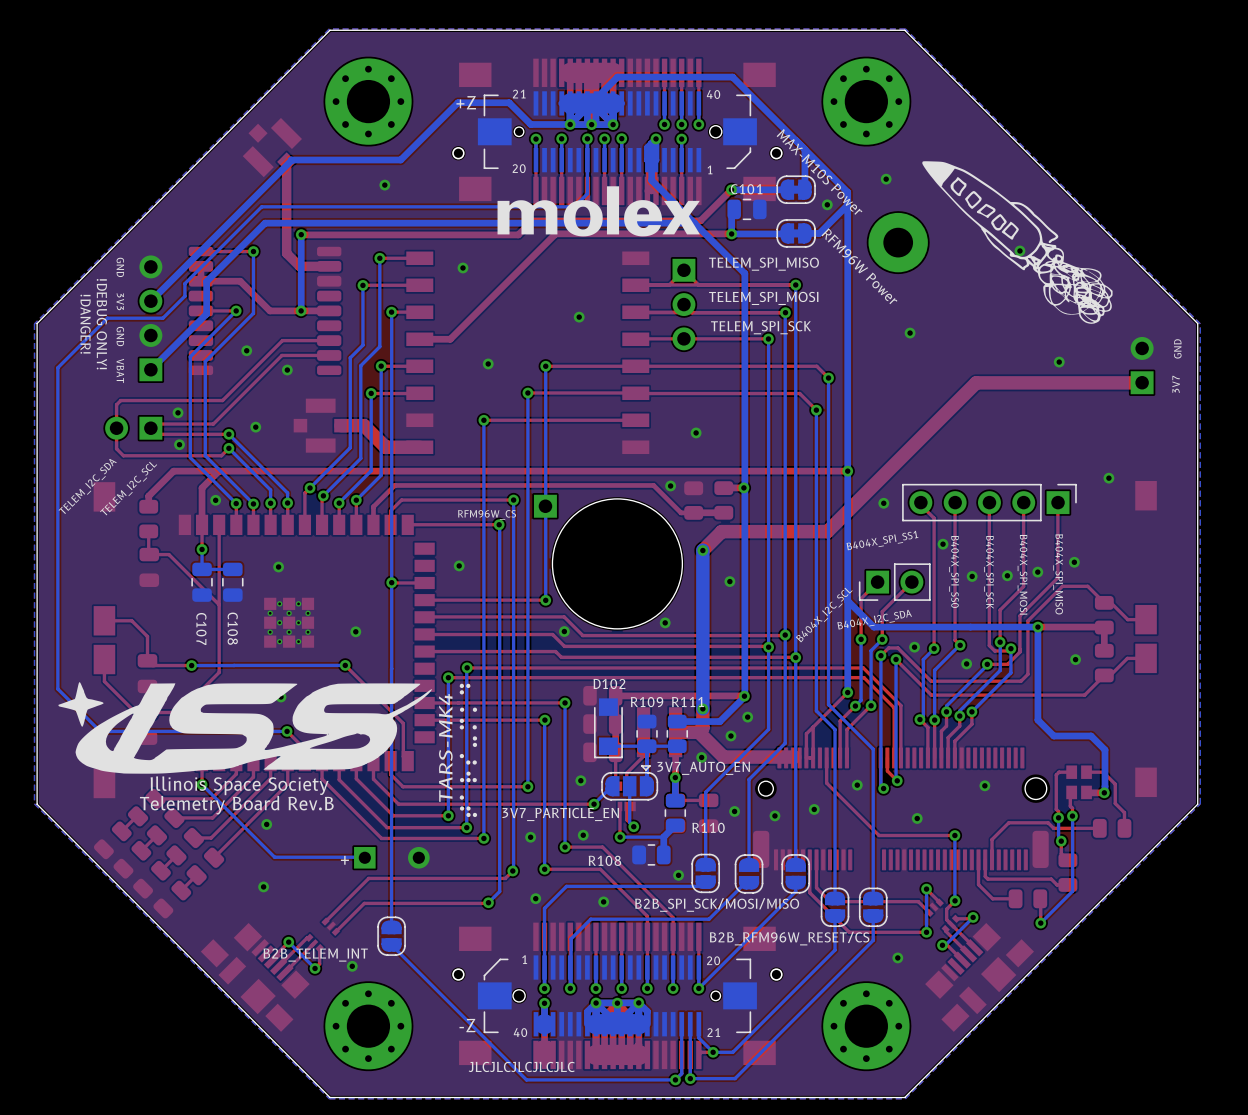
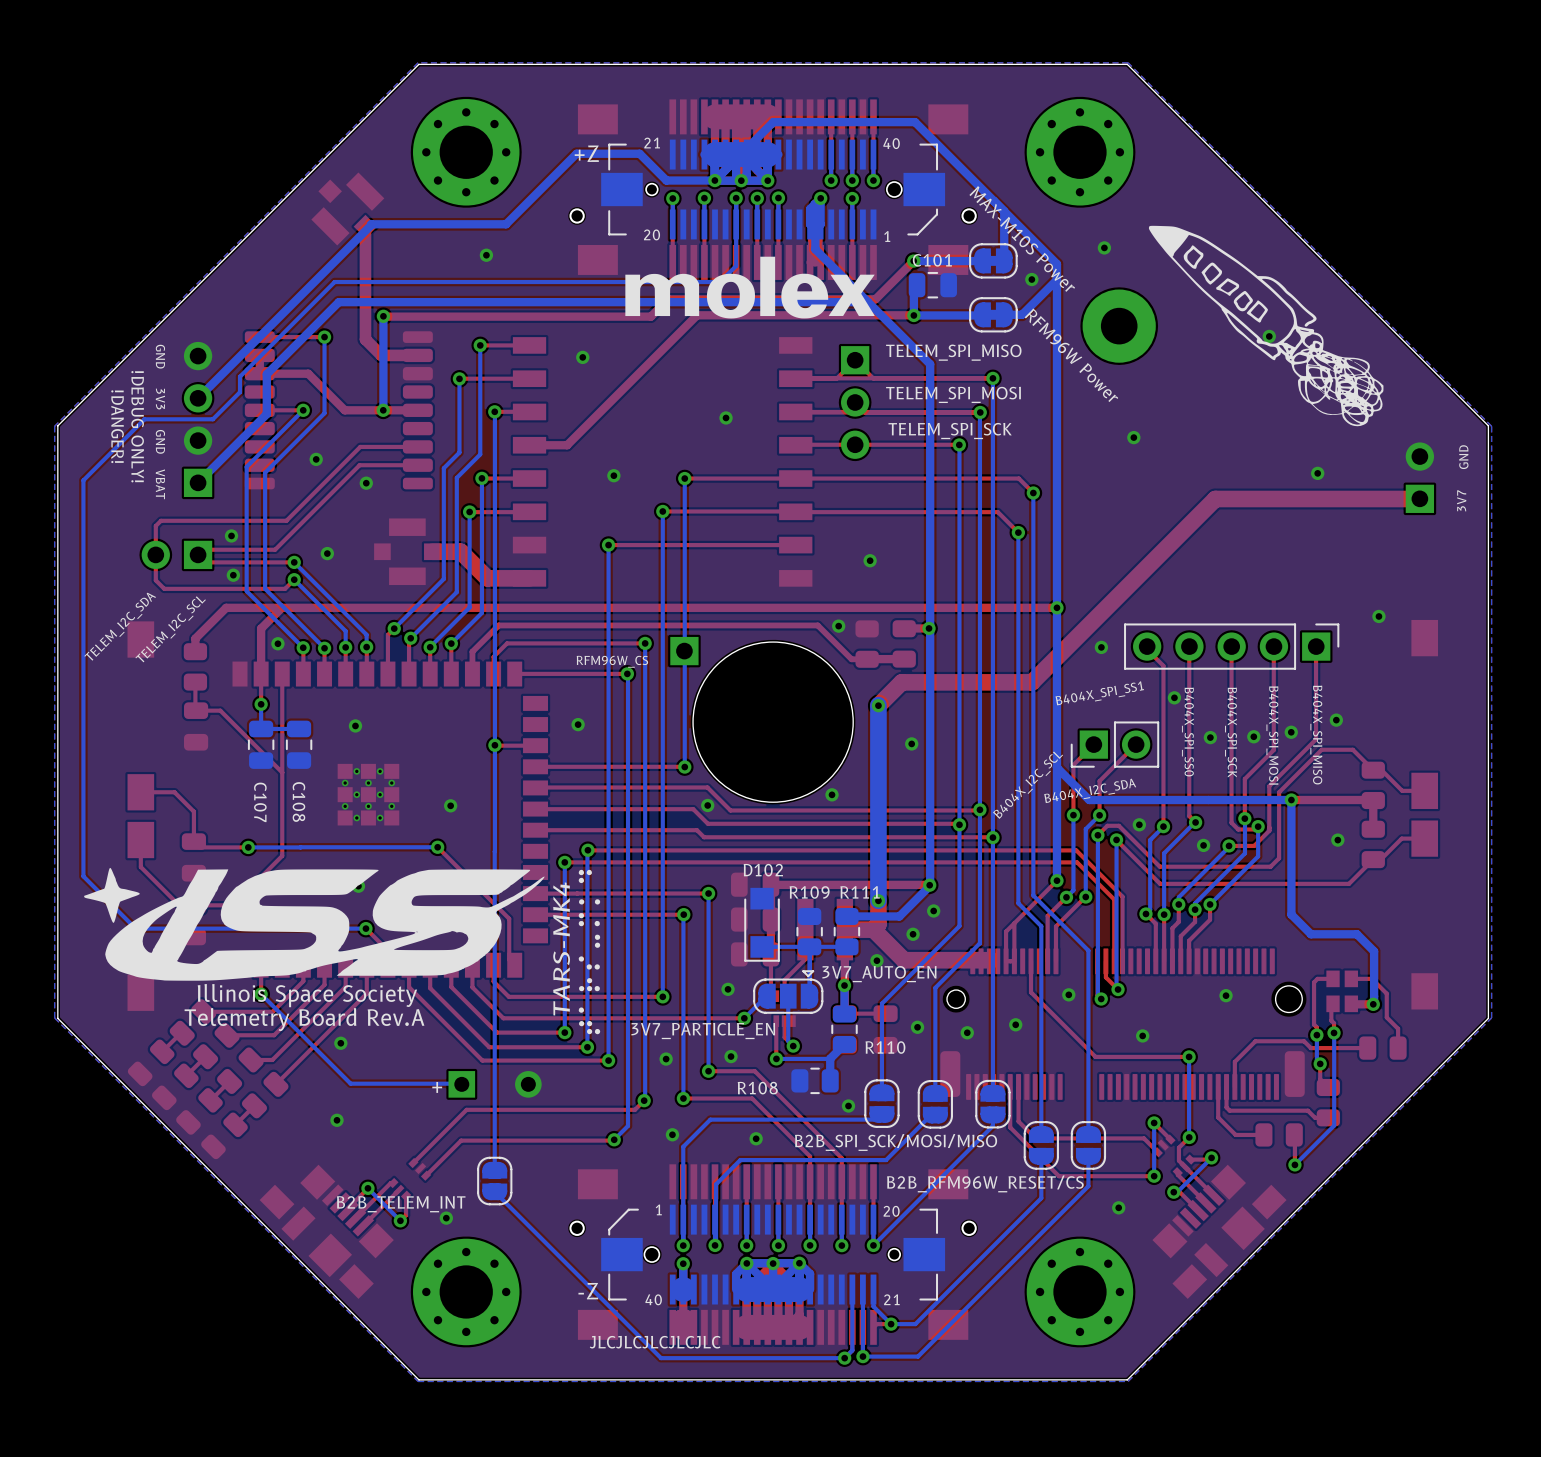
text: Telemetry Board Rev.B (236, 805) -> Telemetry Board Rev.A (304, 1019)

